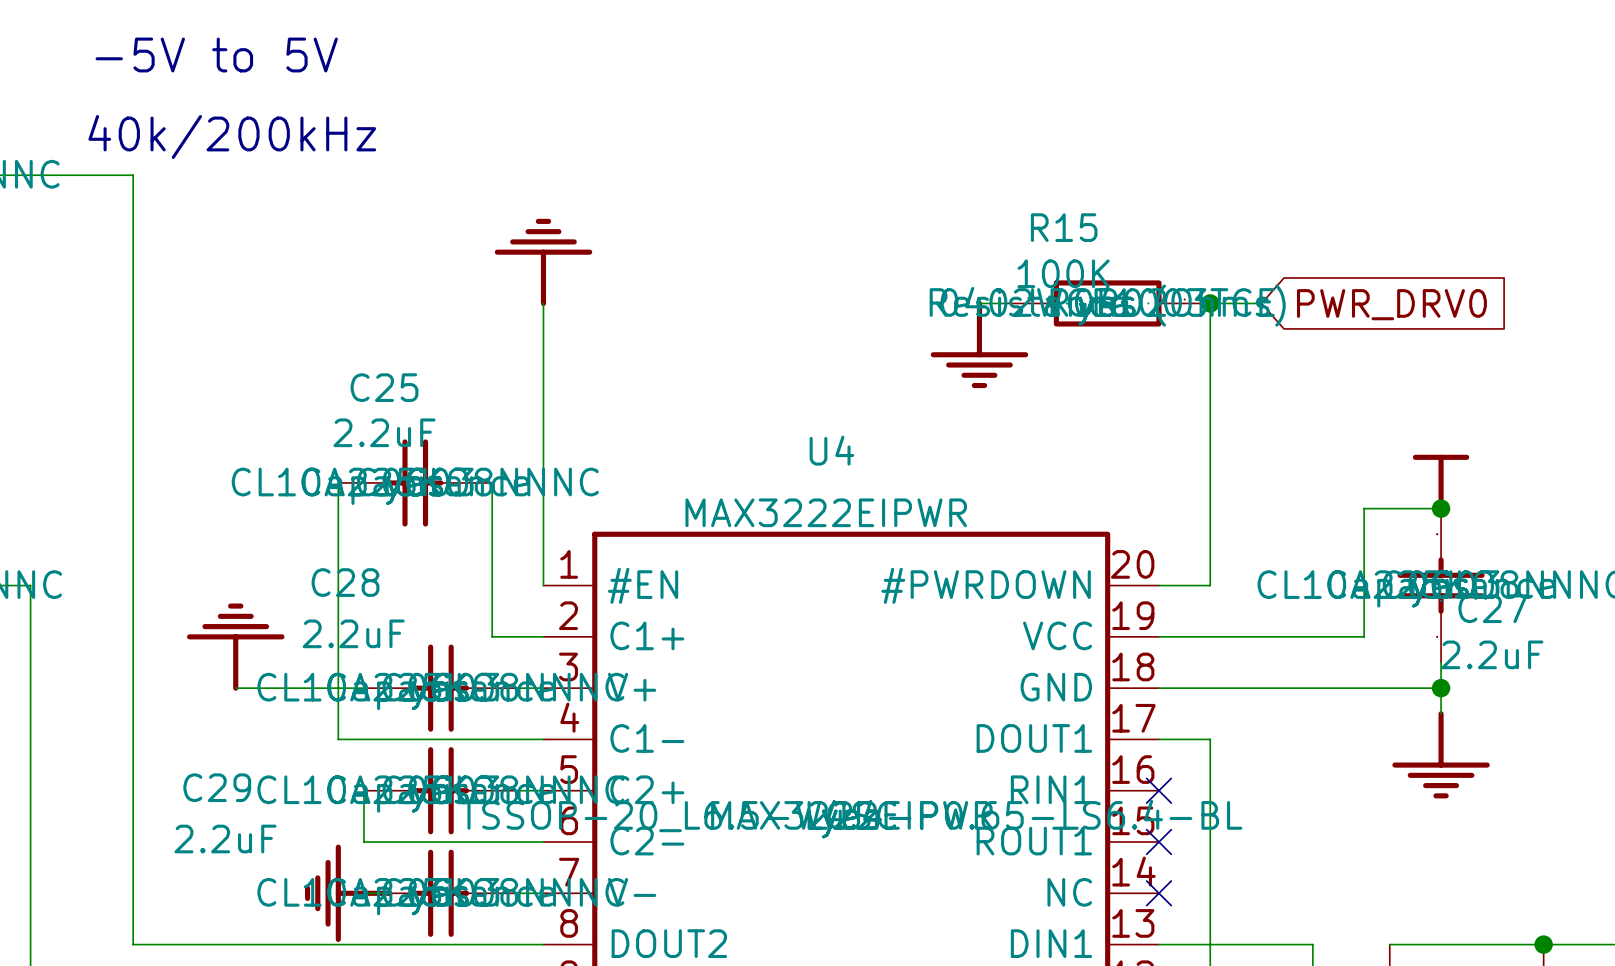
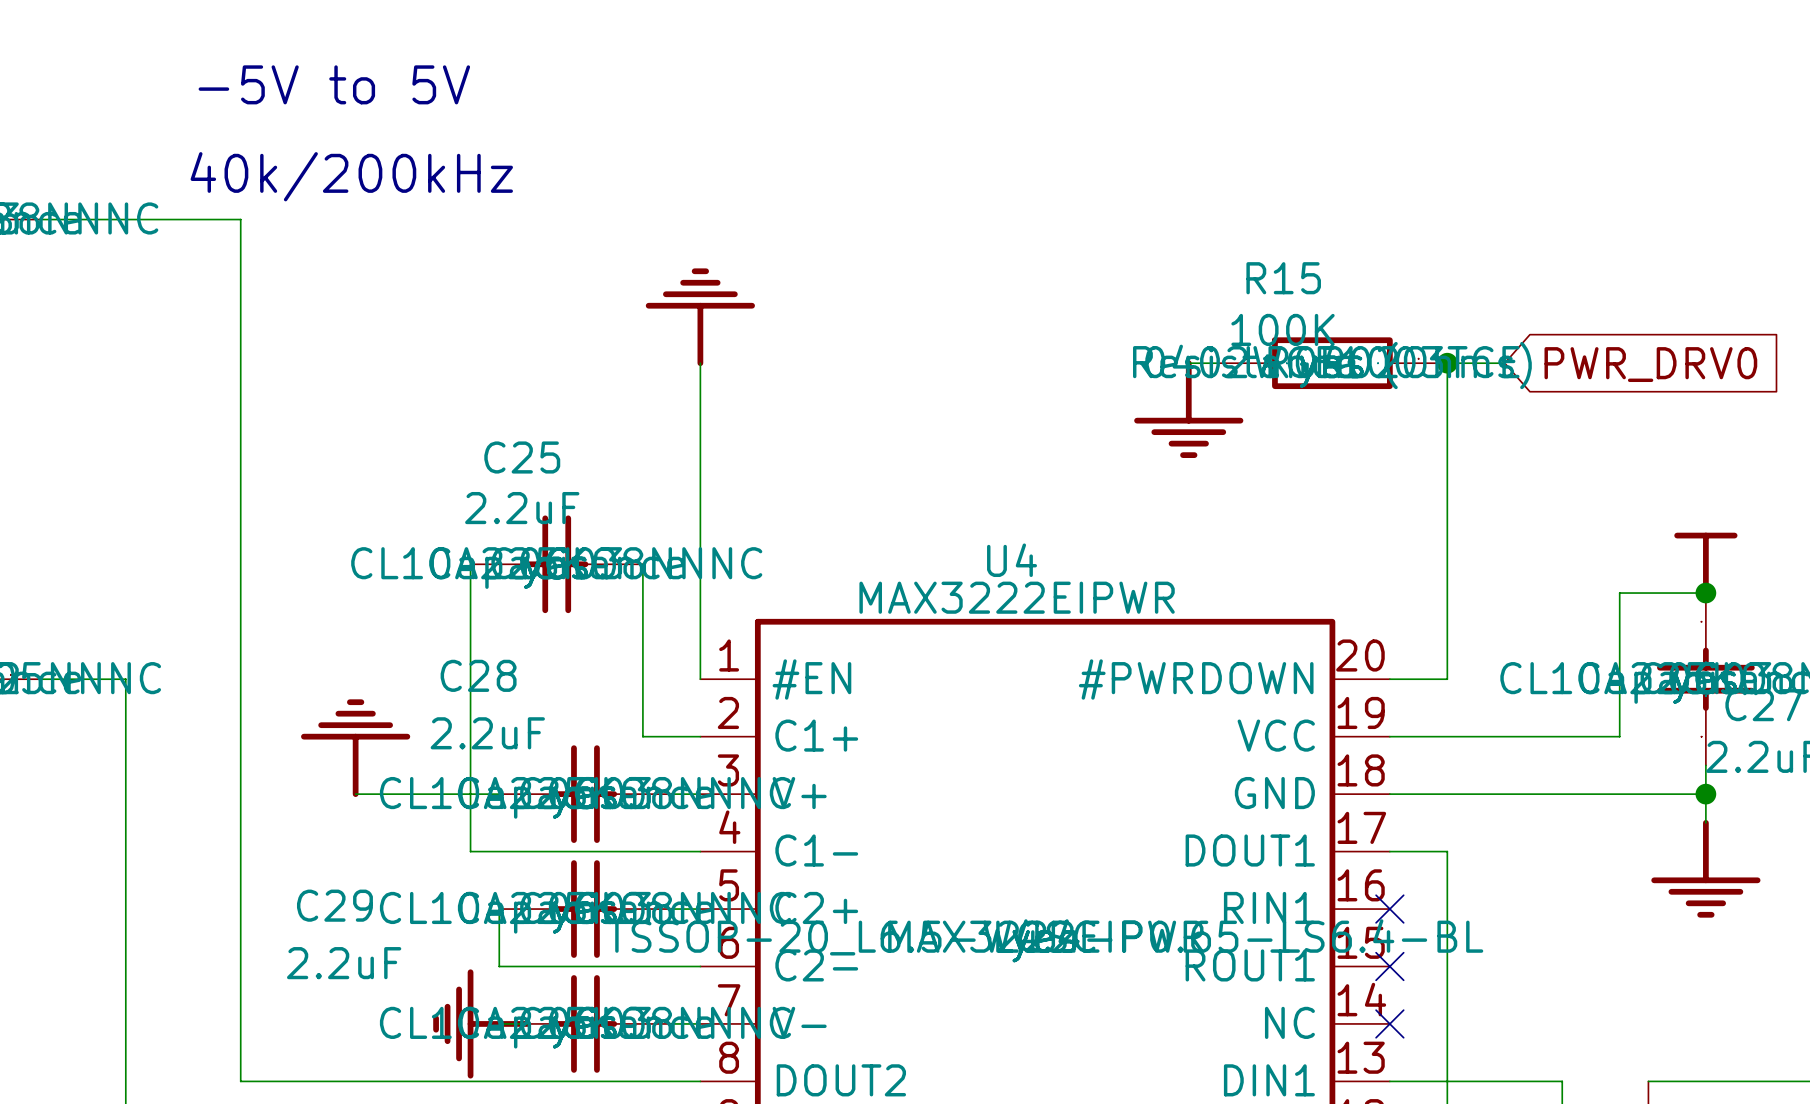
U4 name position: U4 (831, 450) -> U4 (1012, 560)

